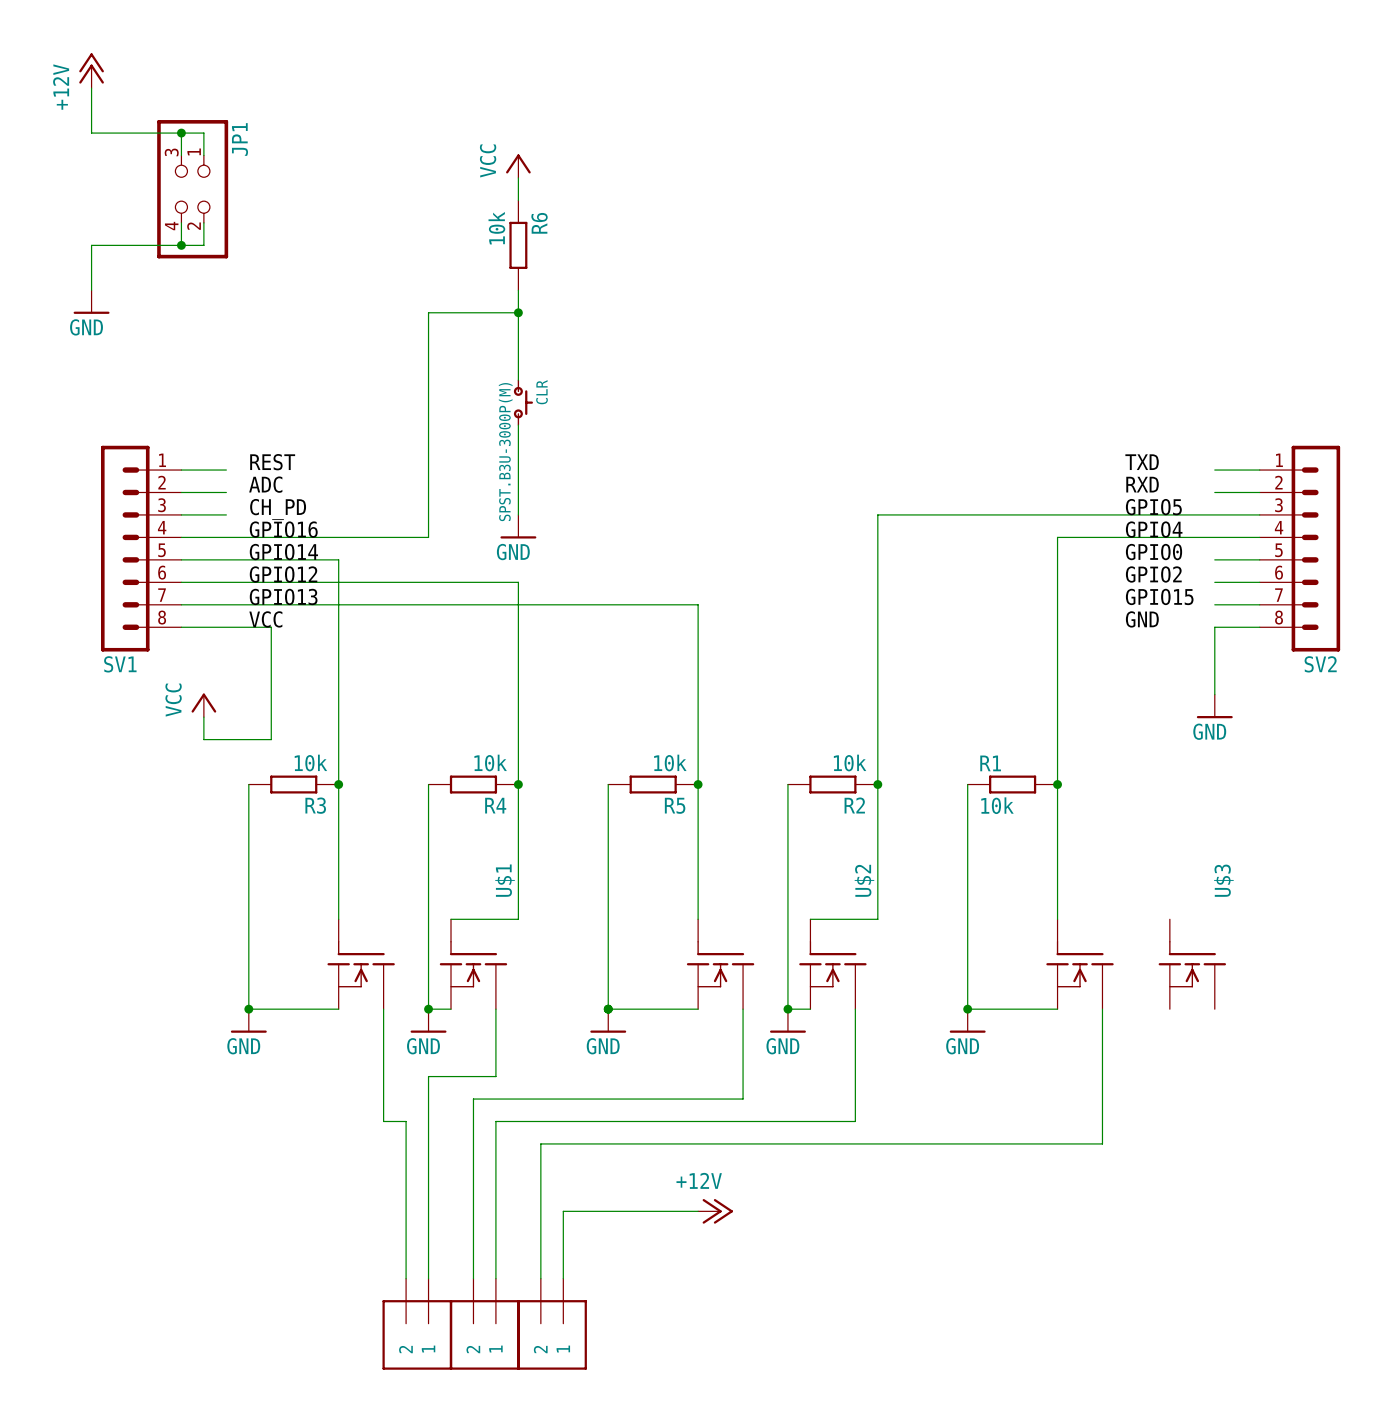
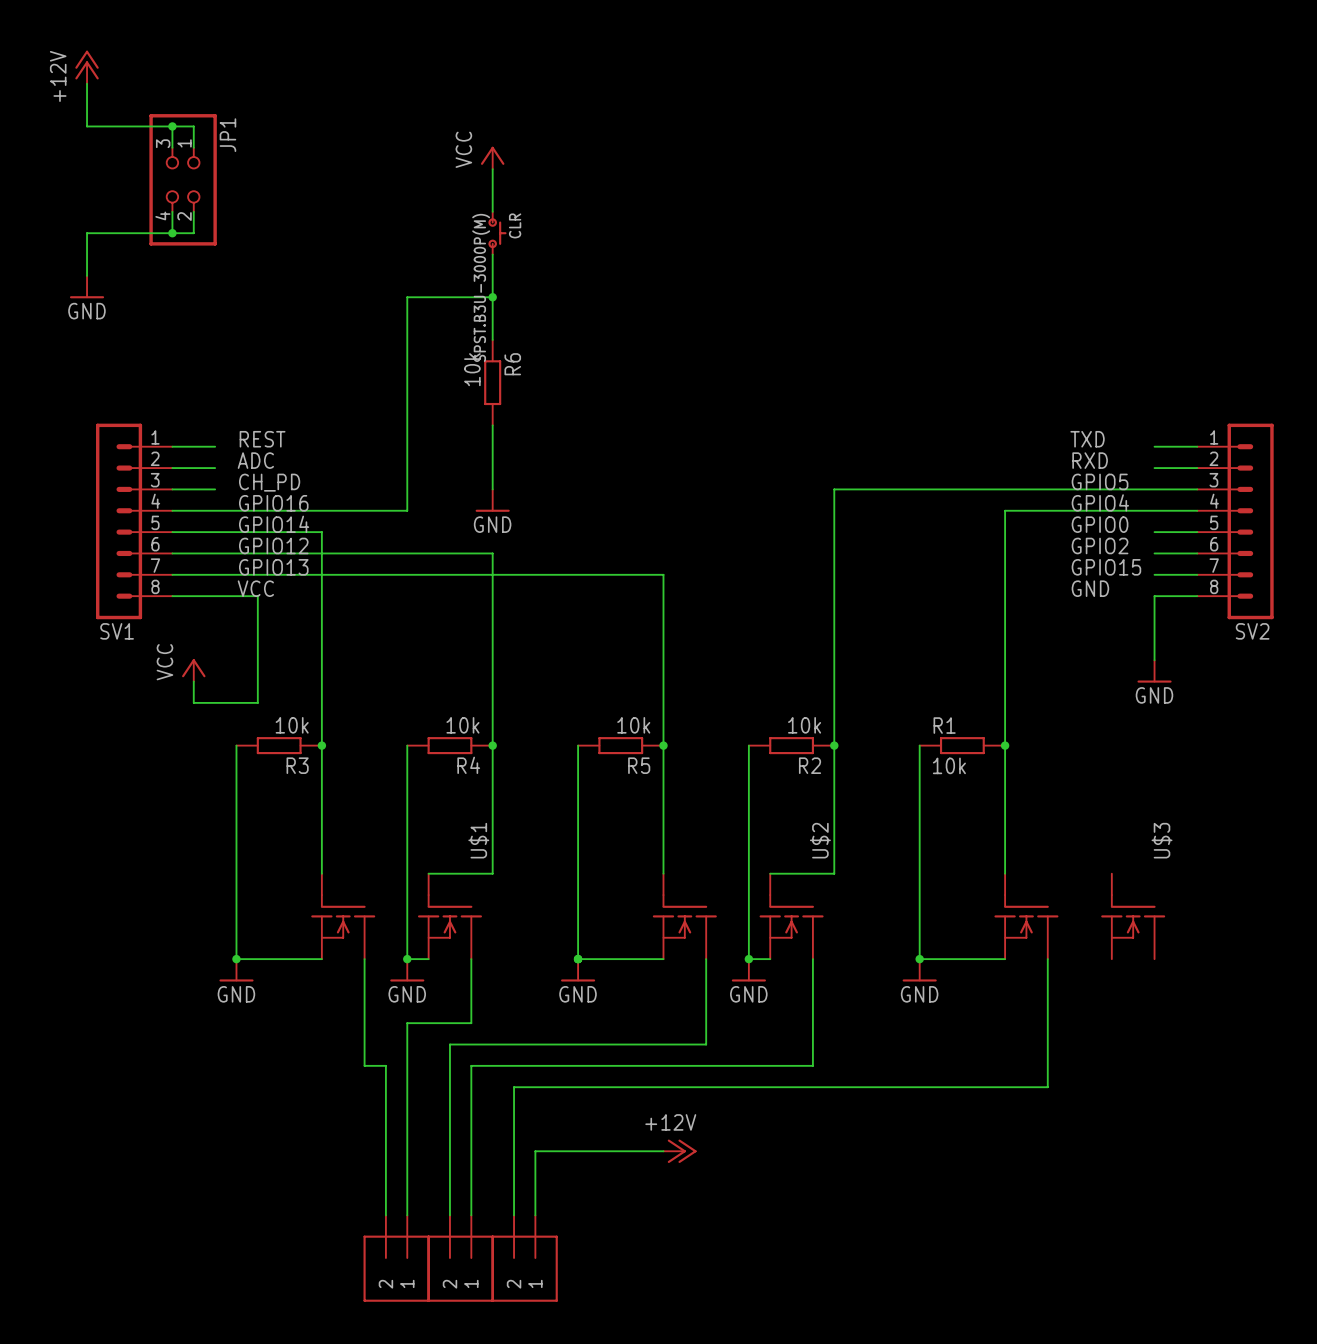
R6 position: (518, 245) -> (492, 382)
CLR position: (523, 402) -> (497, 233)

